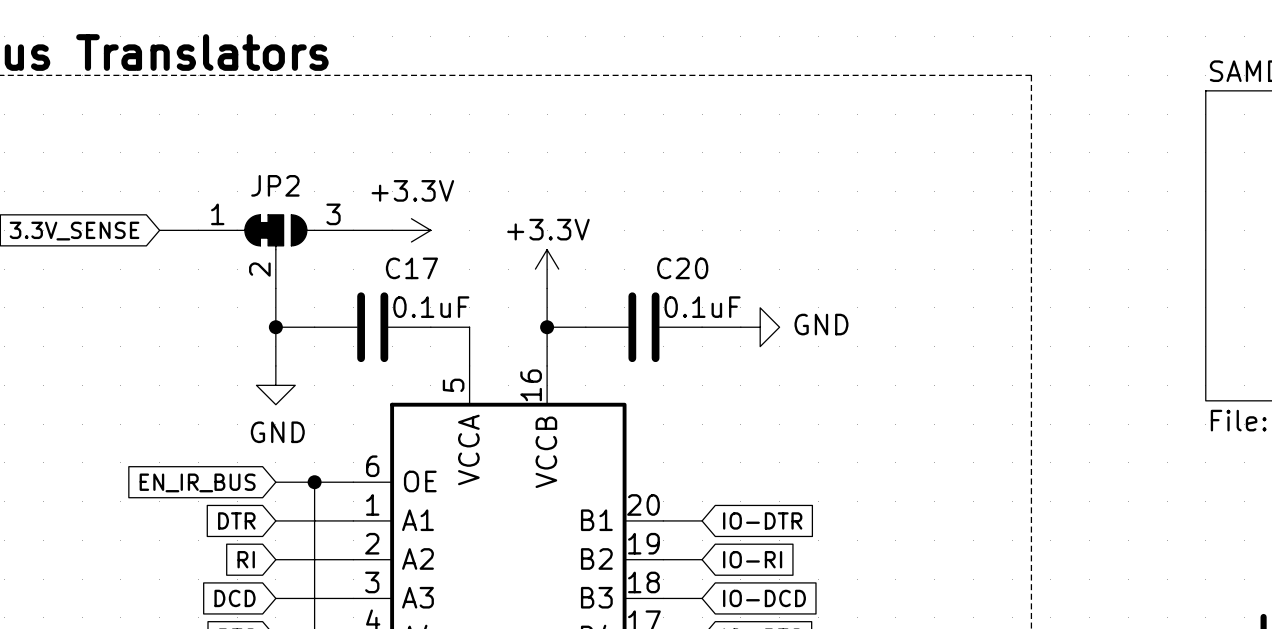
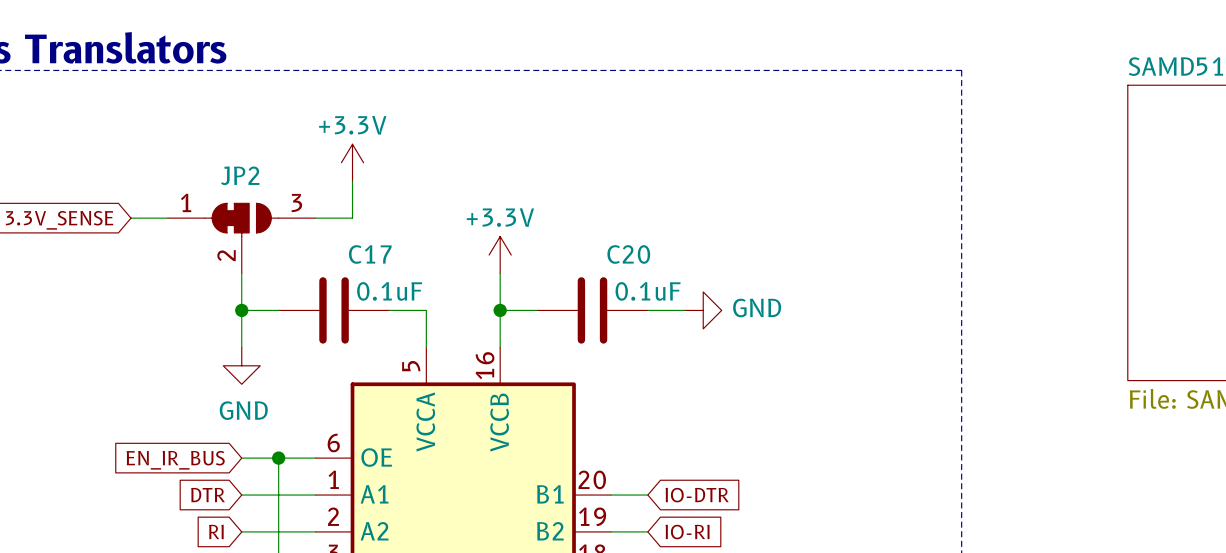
wire: none -> (352, 181) (352, 218)
power symbol rotation: 0° (411, 230) -> 90° counterclockwise (352, 162)
power symbol position: +3.3V (411, 230) -> +3.3V (352, 162)

